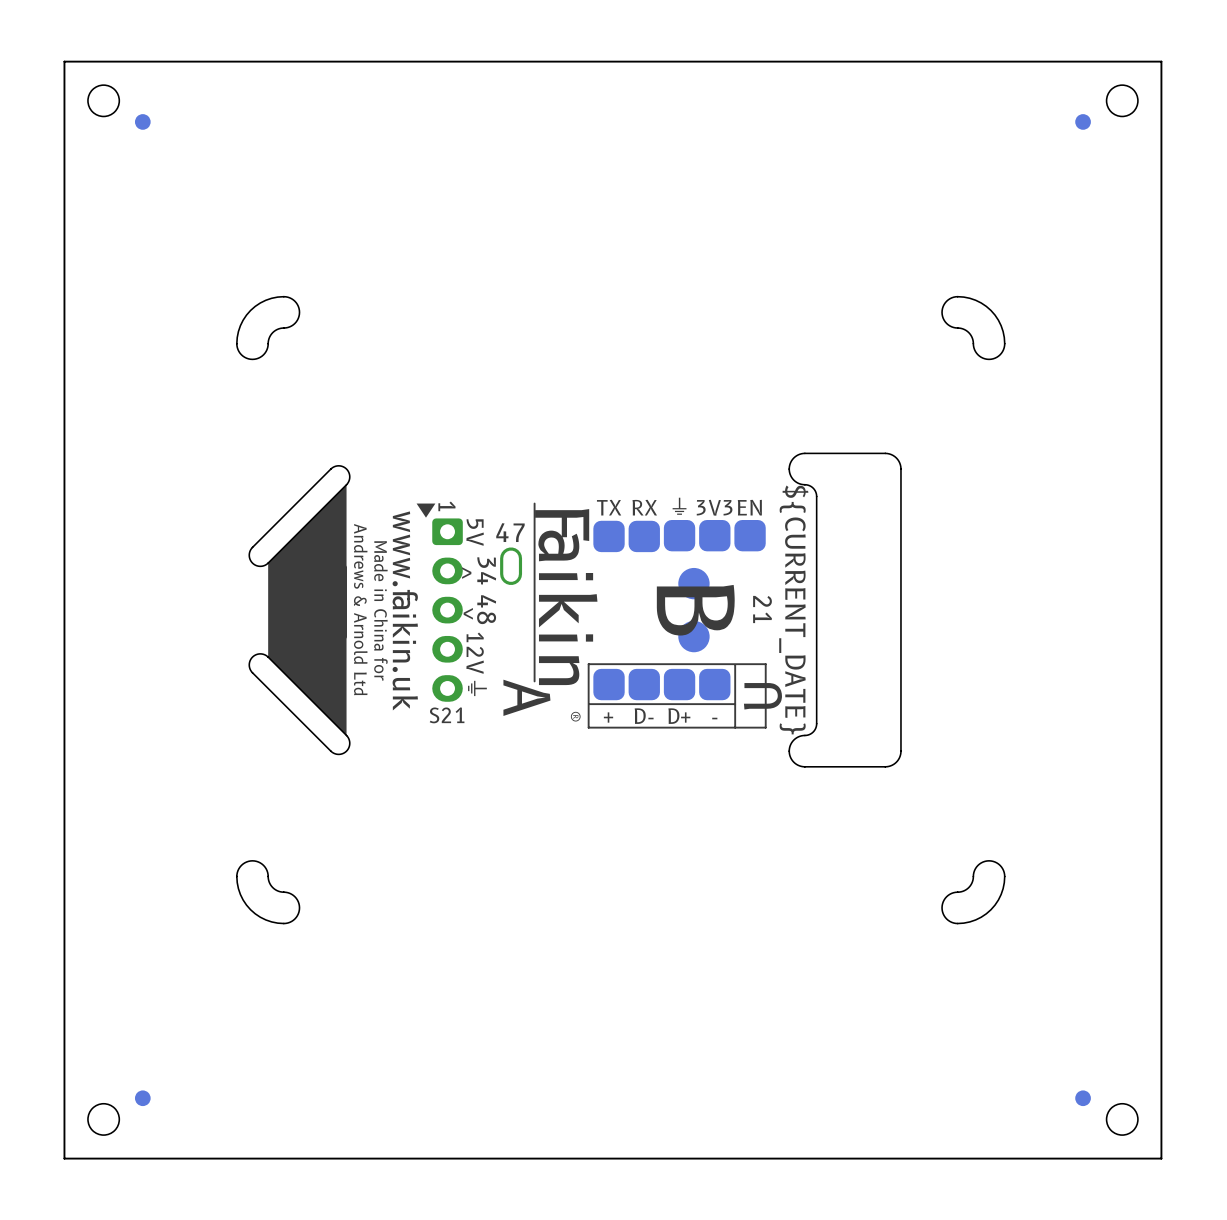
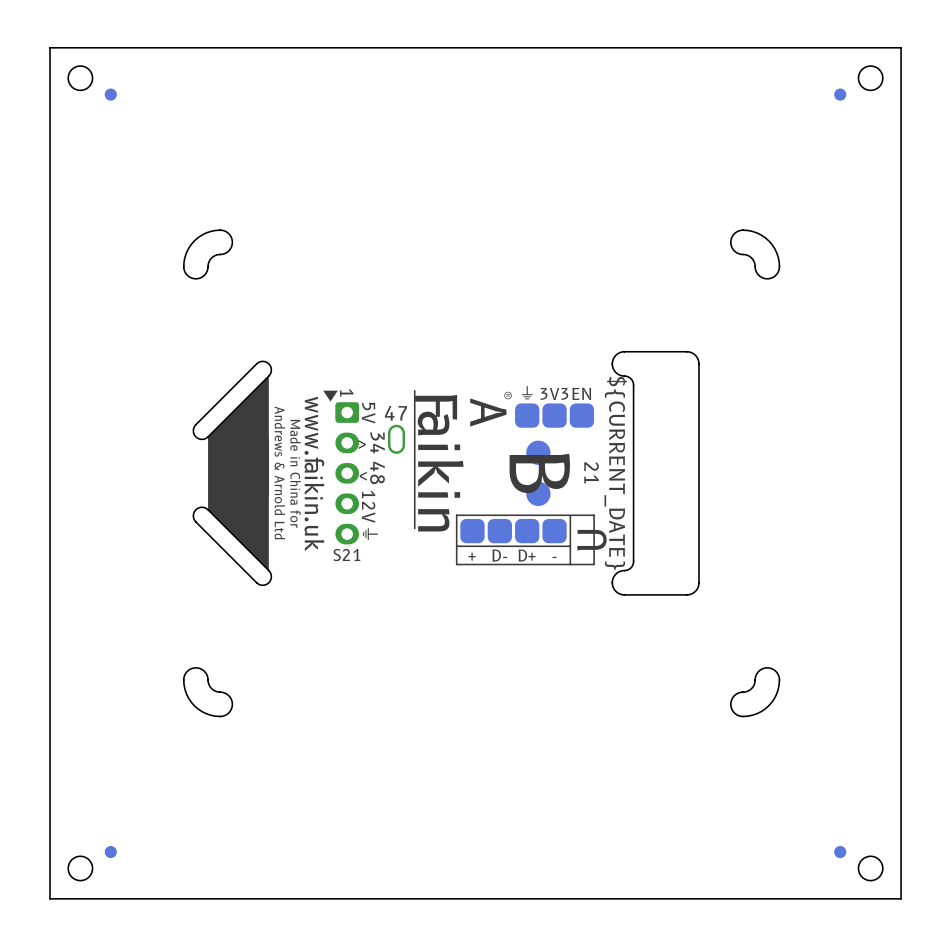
text: TX (609, 507) -> none
text: RX (644, 507) -> ® (508, 395)
part: (609, 536) -> none
part: (644, 536) -> none
text position: A (526, 697) -> A (488, 412)
text: ® (575, 716) -> none

